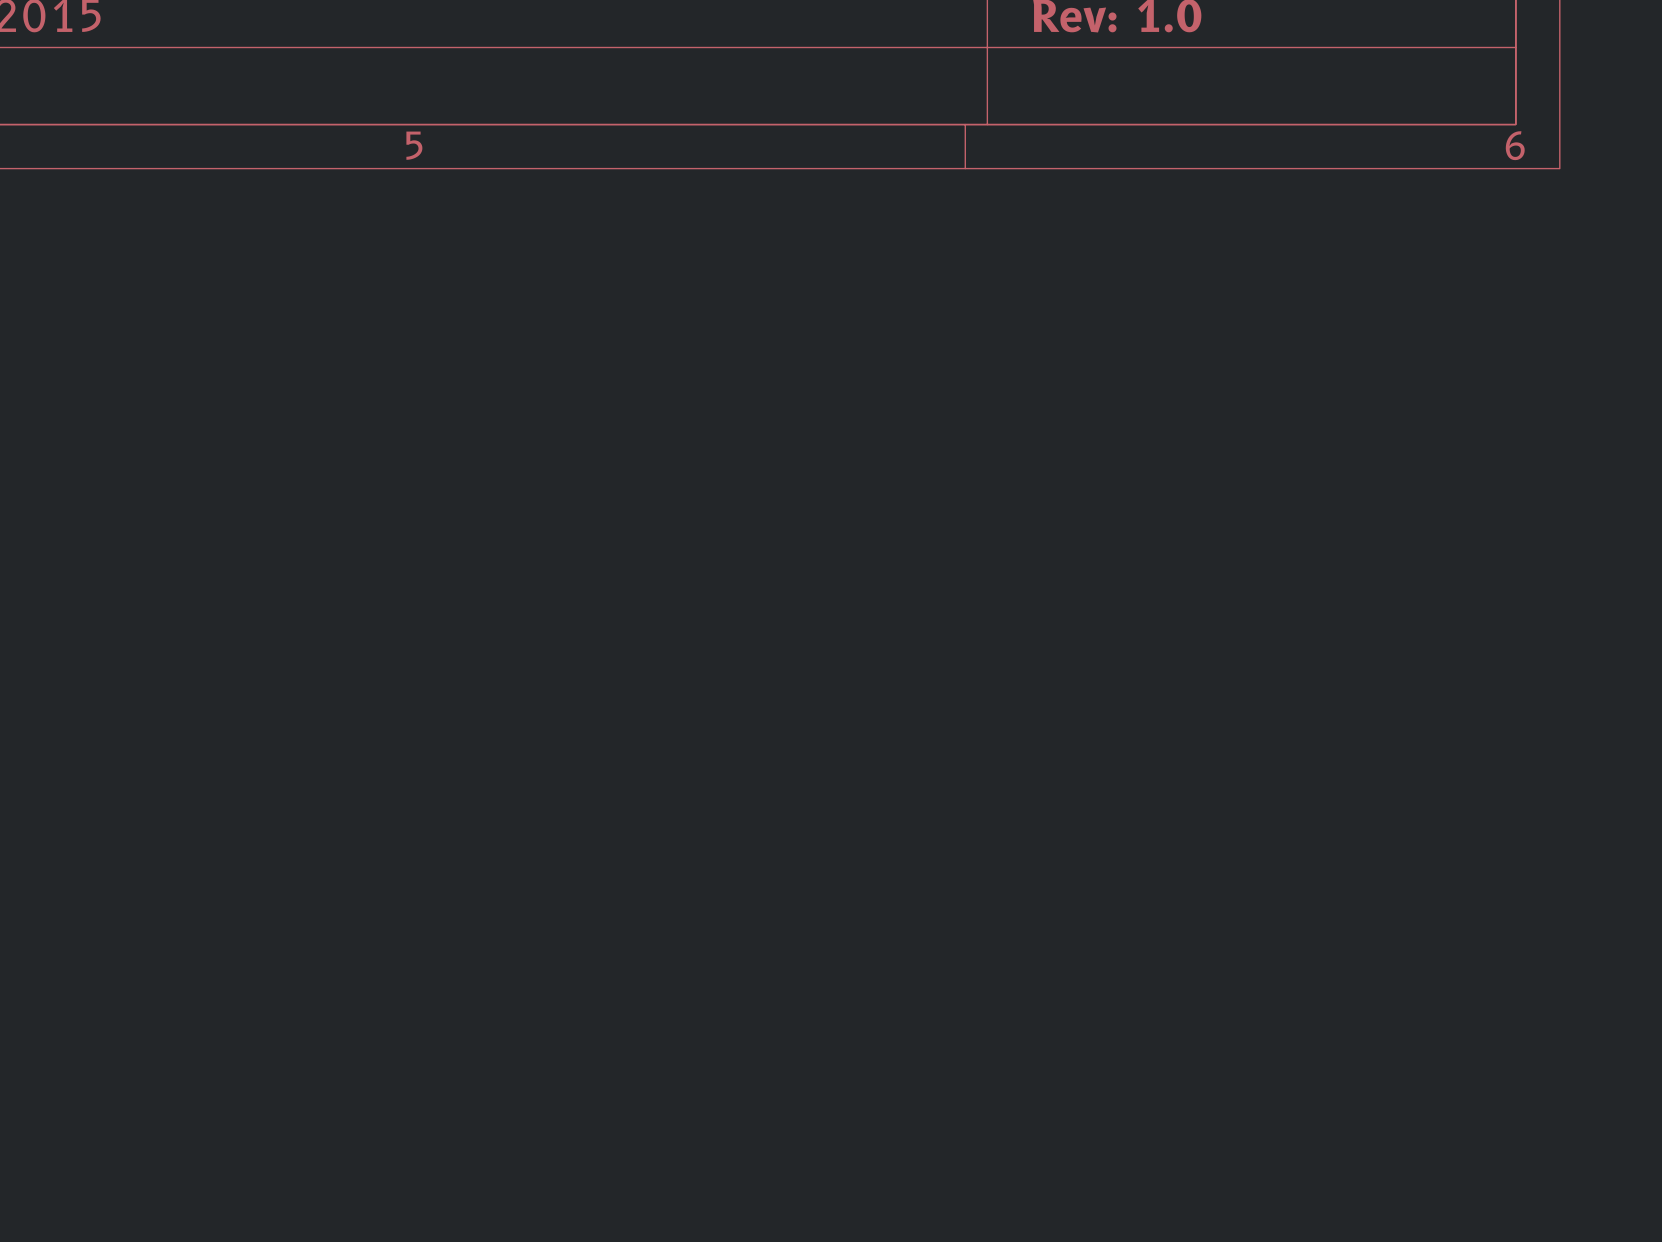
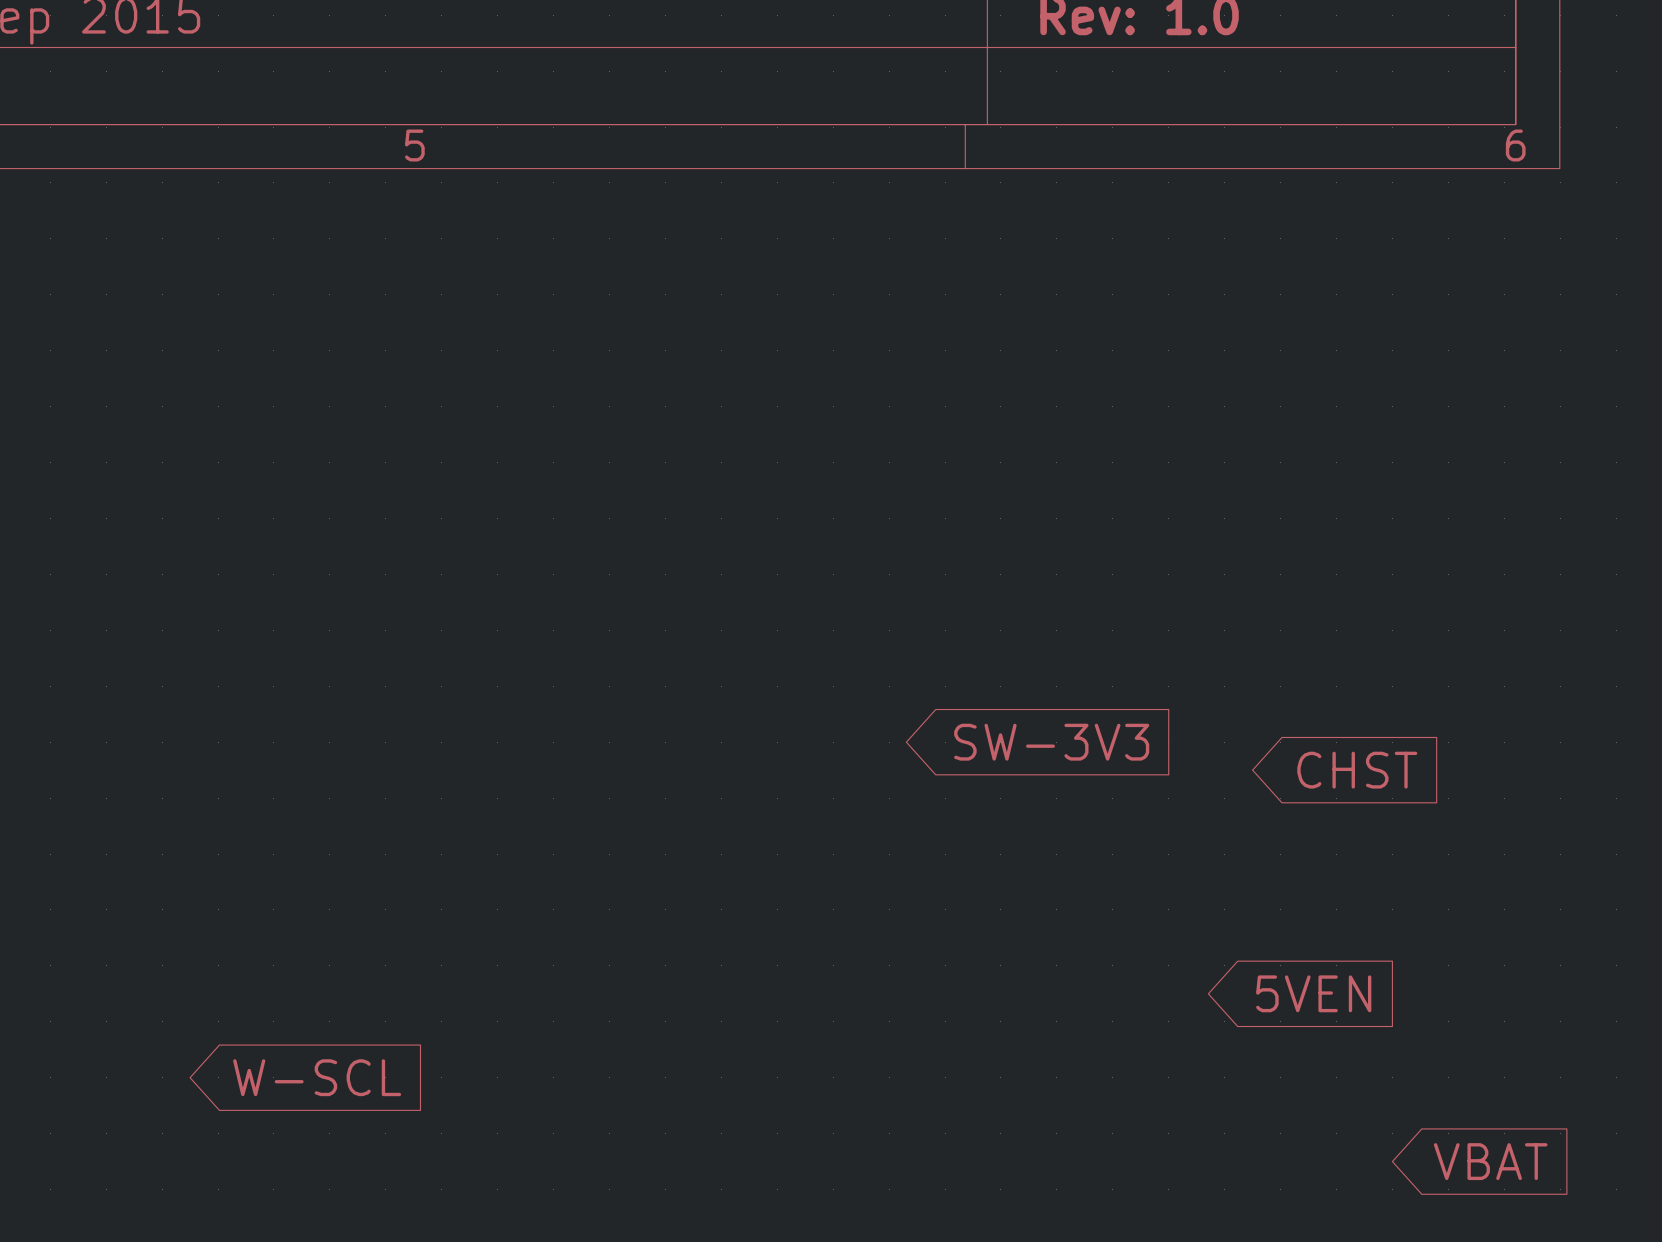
global label: none -> SW-3V3 (1051, 742)
global label: none -> CHST (1357, 770)
global label: none -> 5VEN (1313, 993)
global label: none -> W-SCL (317, 1077)
global label: none -> VBAT (1490, 1161)

